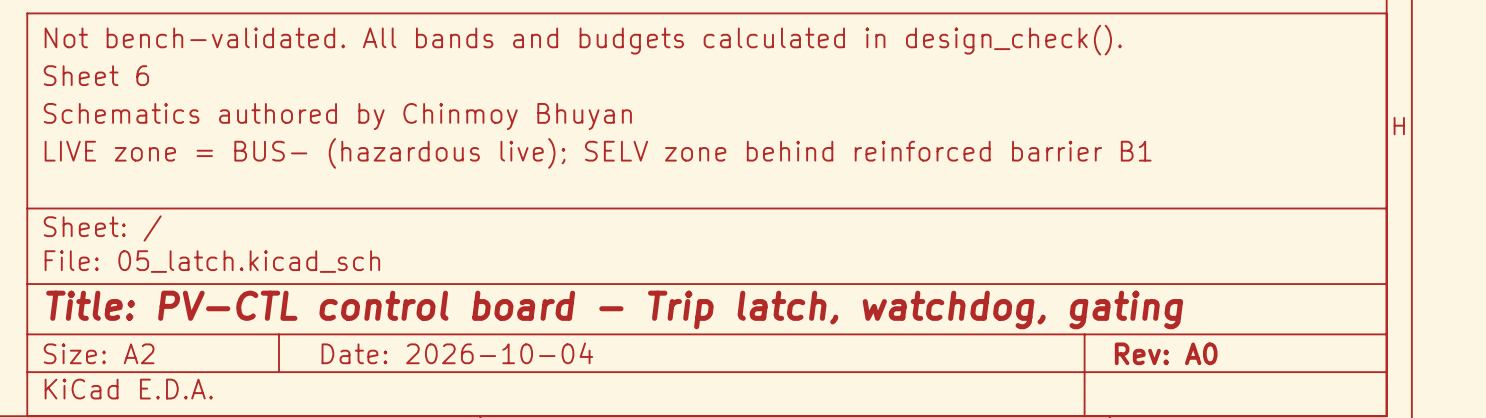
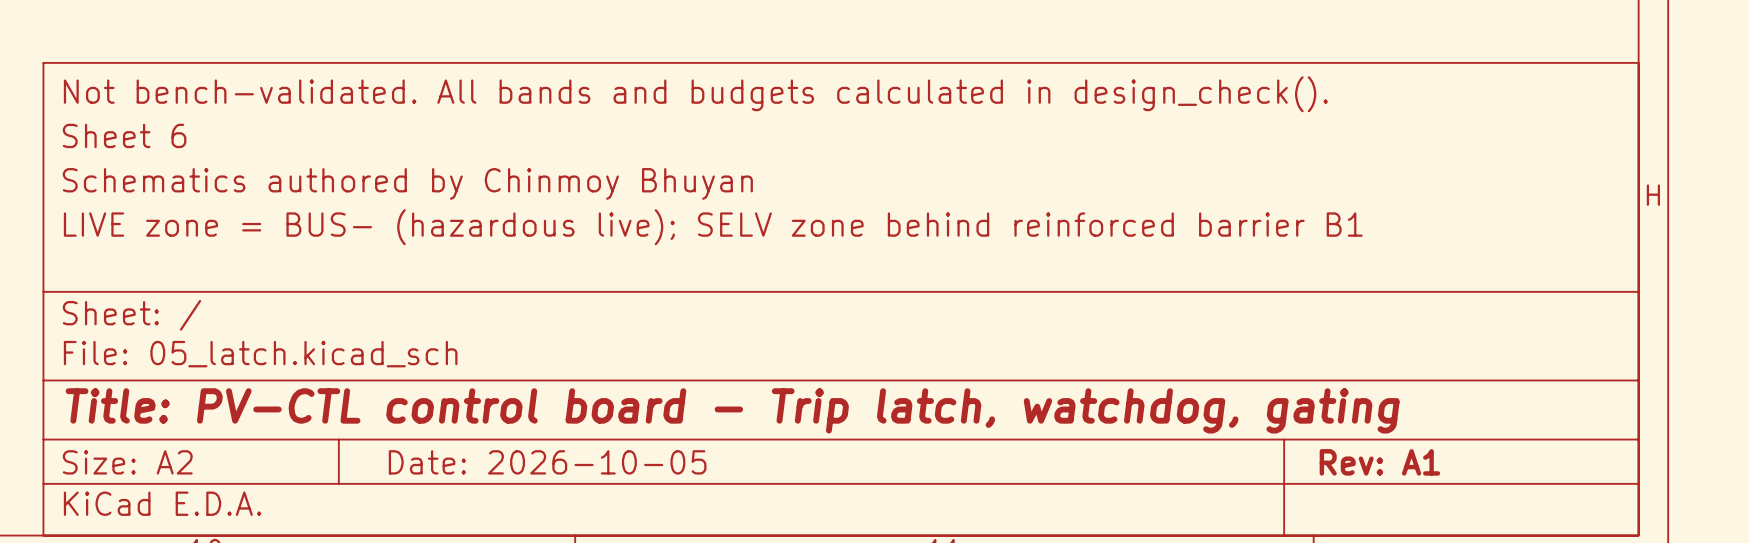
title block: Date: 2026-10-04 (457, 353) -> Date: 2026-10-05 (547, 462)
title block: Rev: A0 (1166, 353) -> Rev: A1 (1379, 462)

